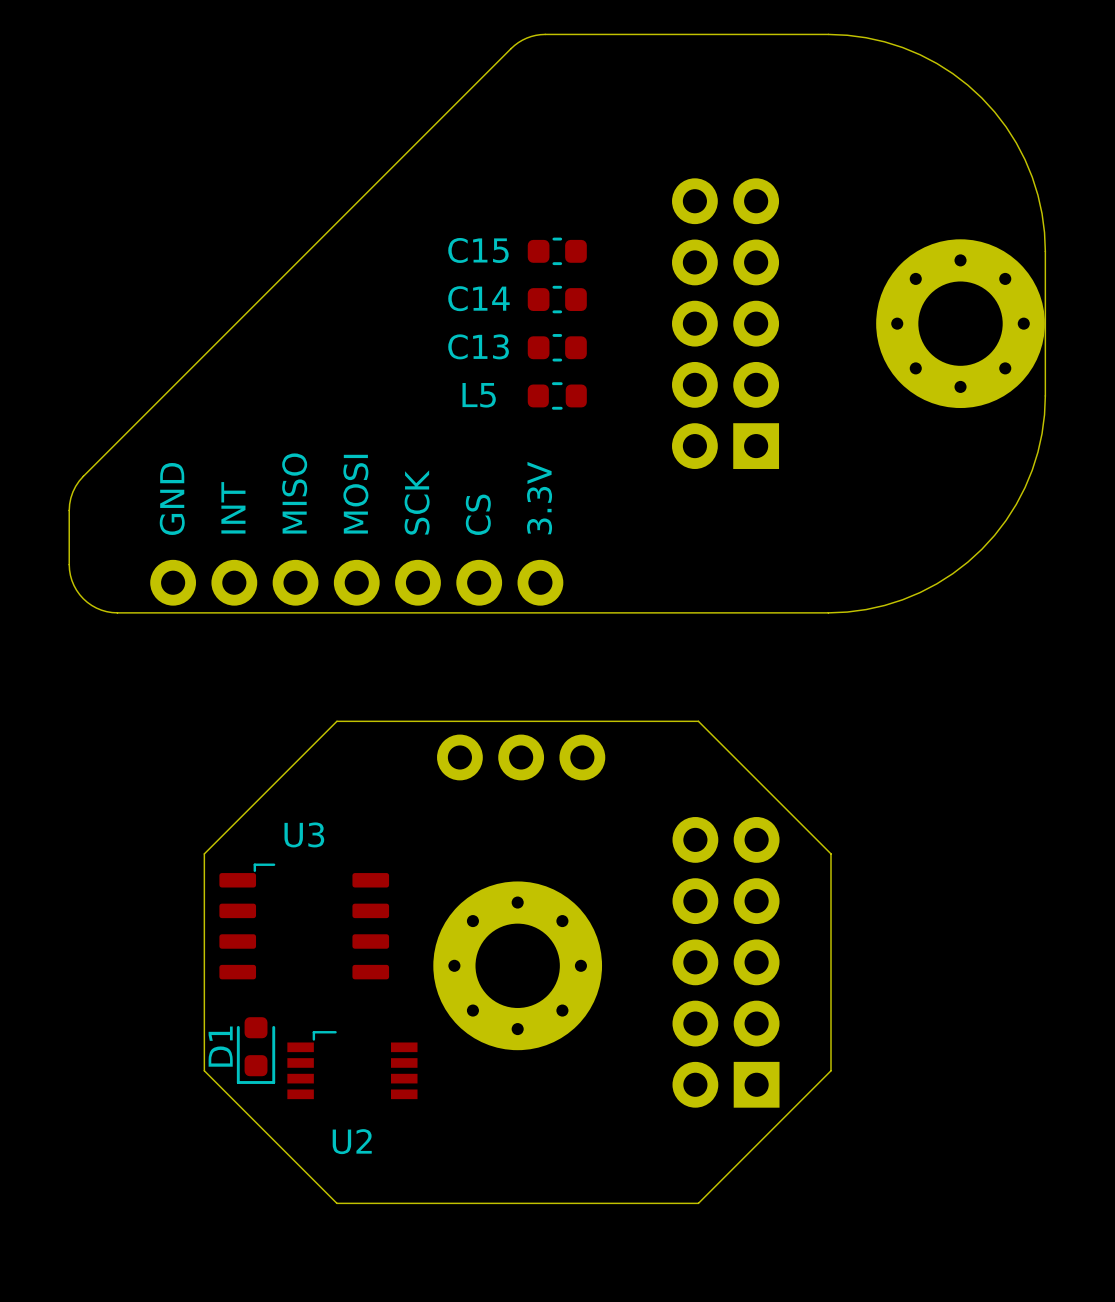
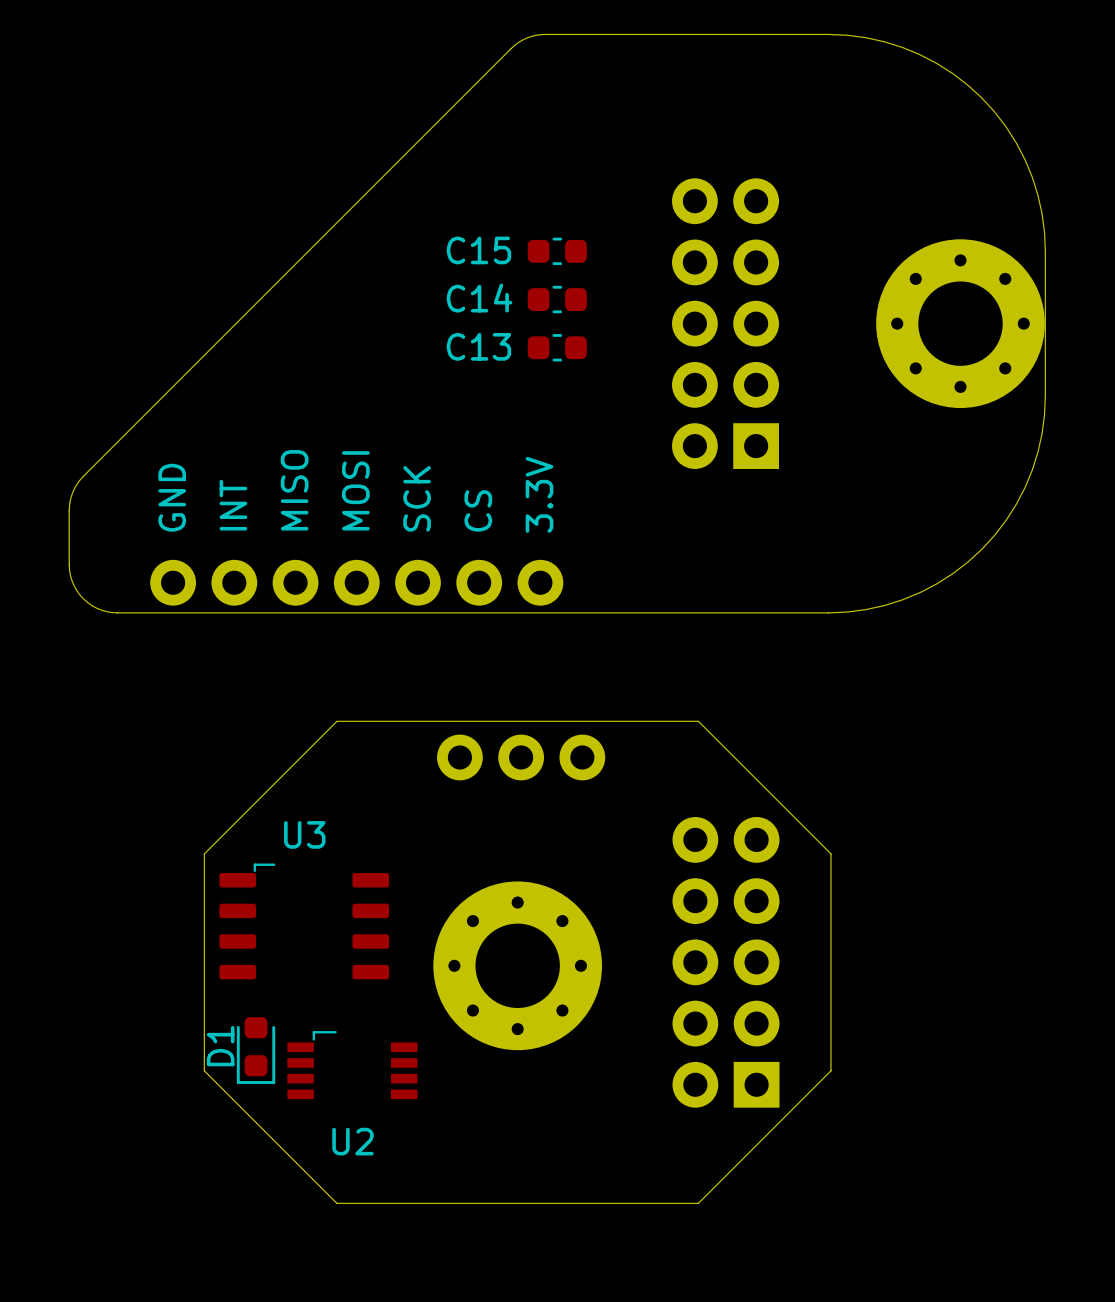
L5: (557, 395) -> none

